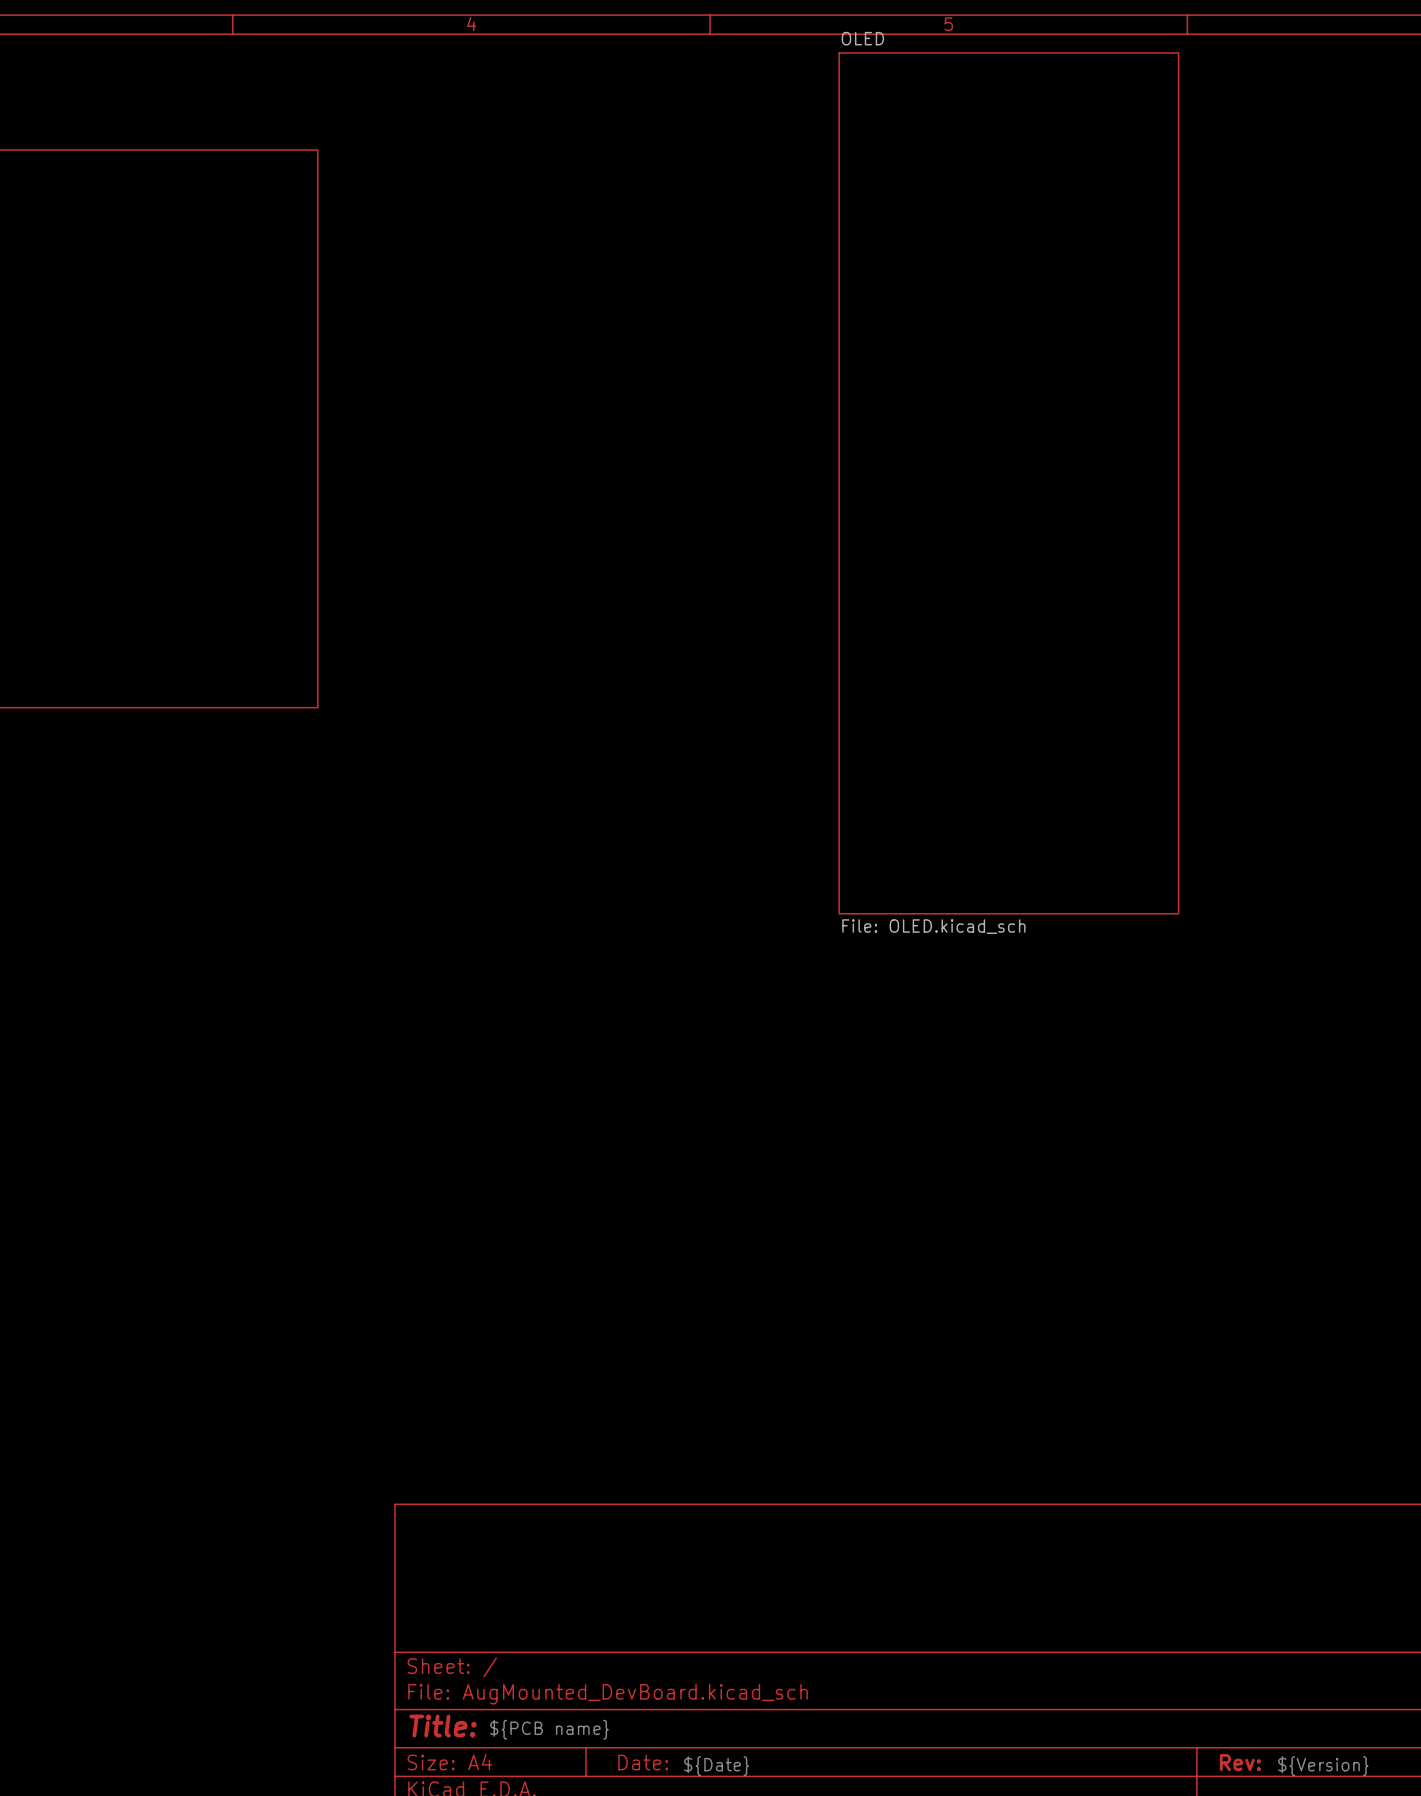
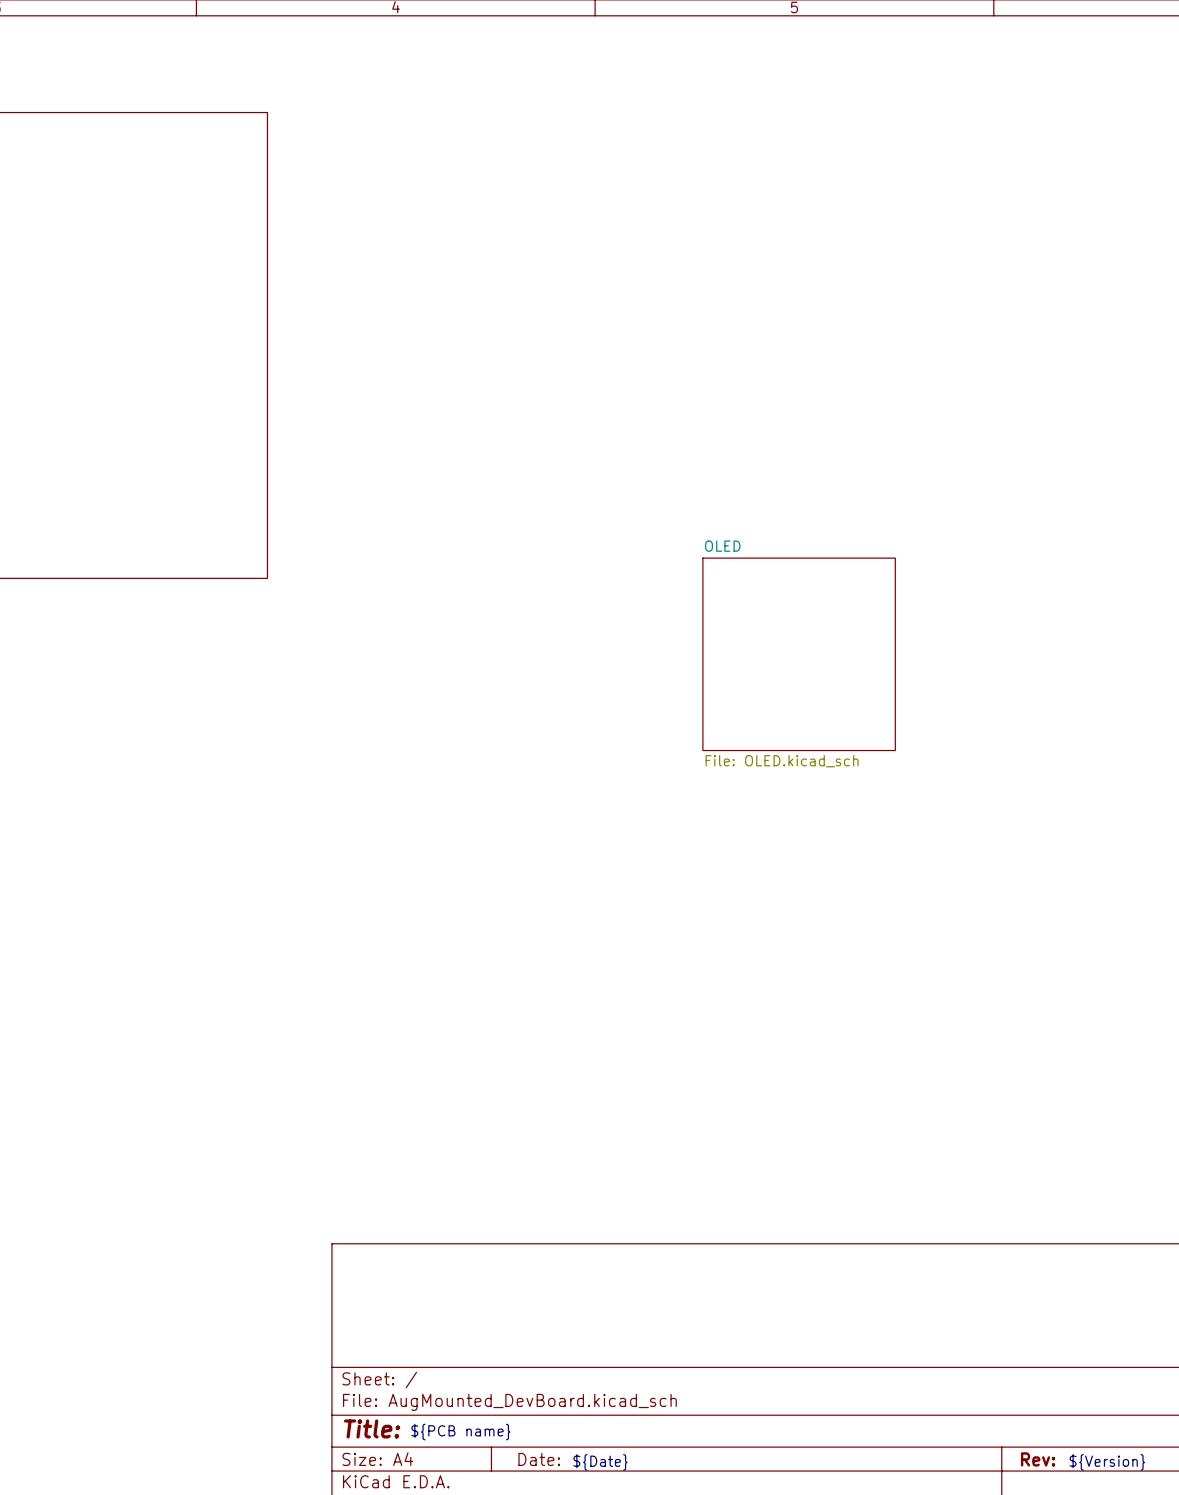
sheet OLED: File: OLED.kicad_sch (1008, 483) -> none
sheet OLED: none -> File: OLED.kicad_sch (799, 654)

